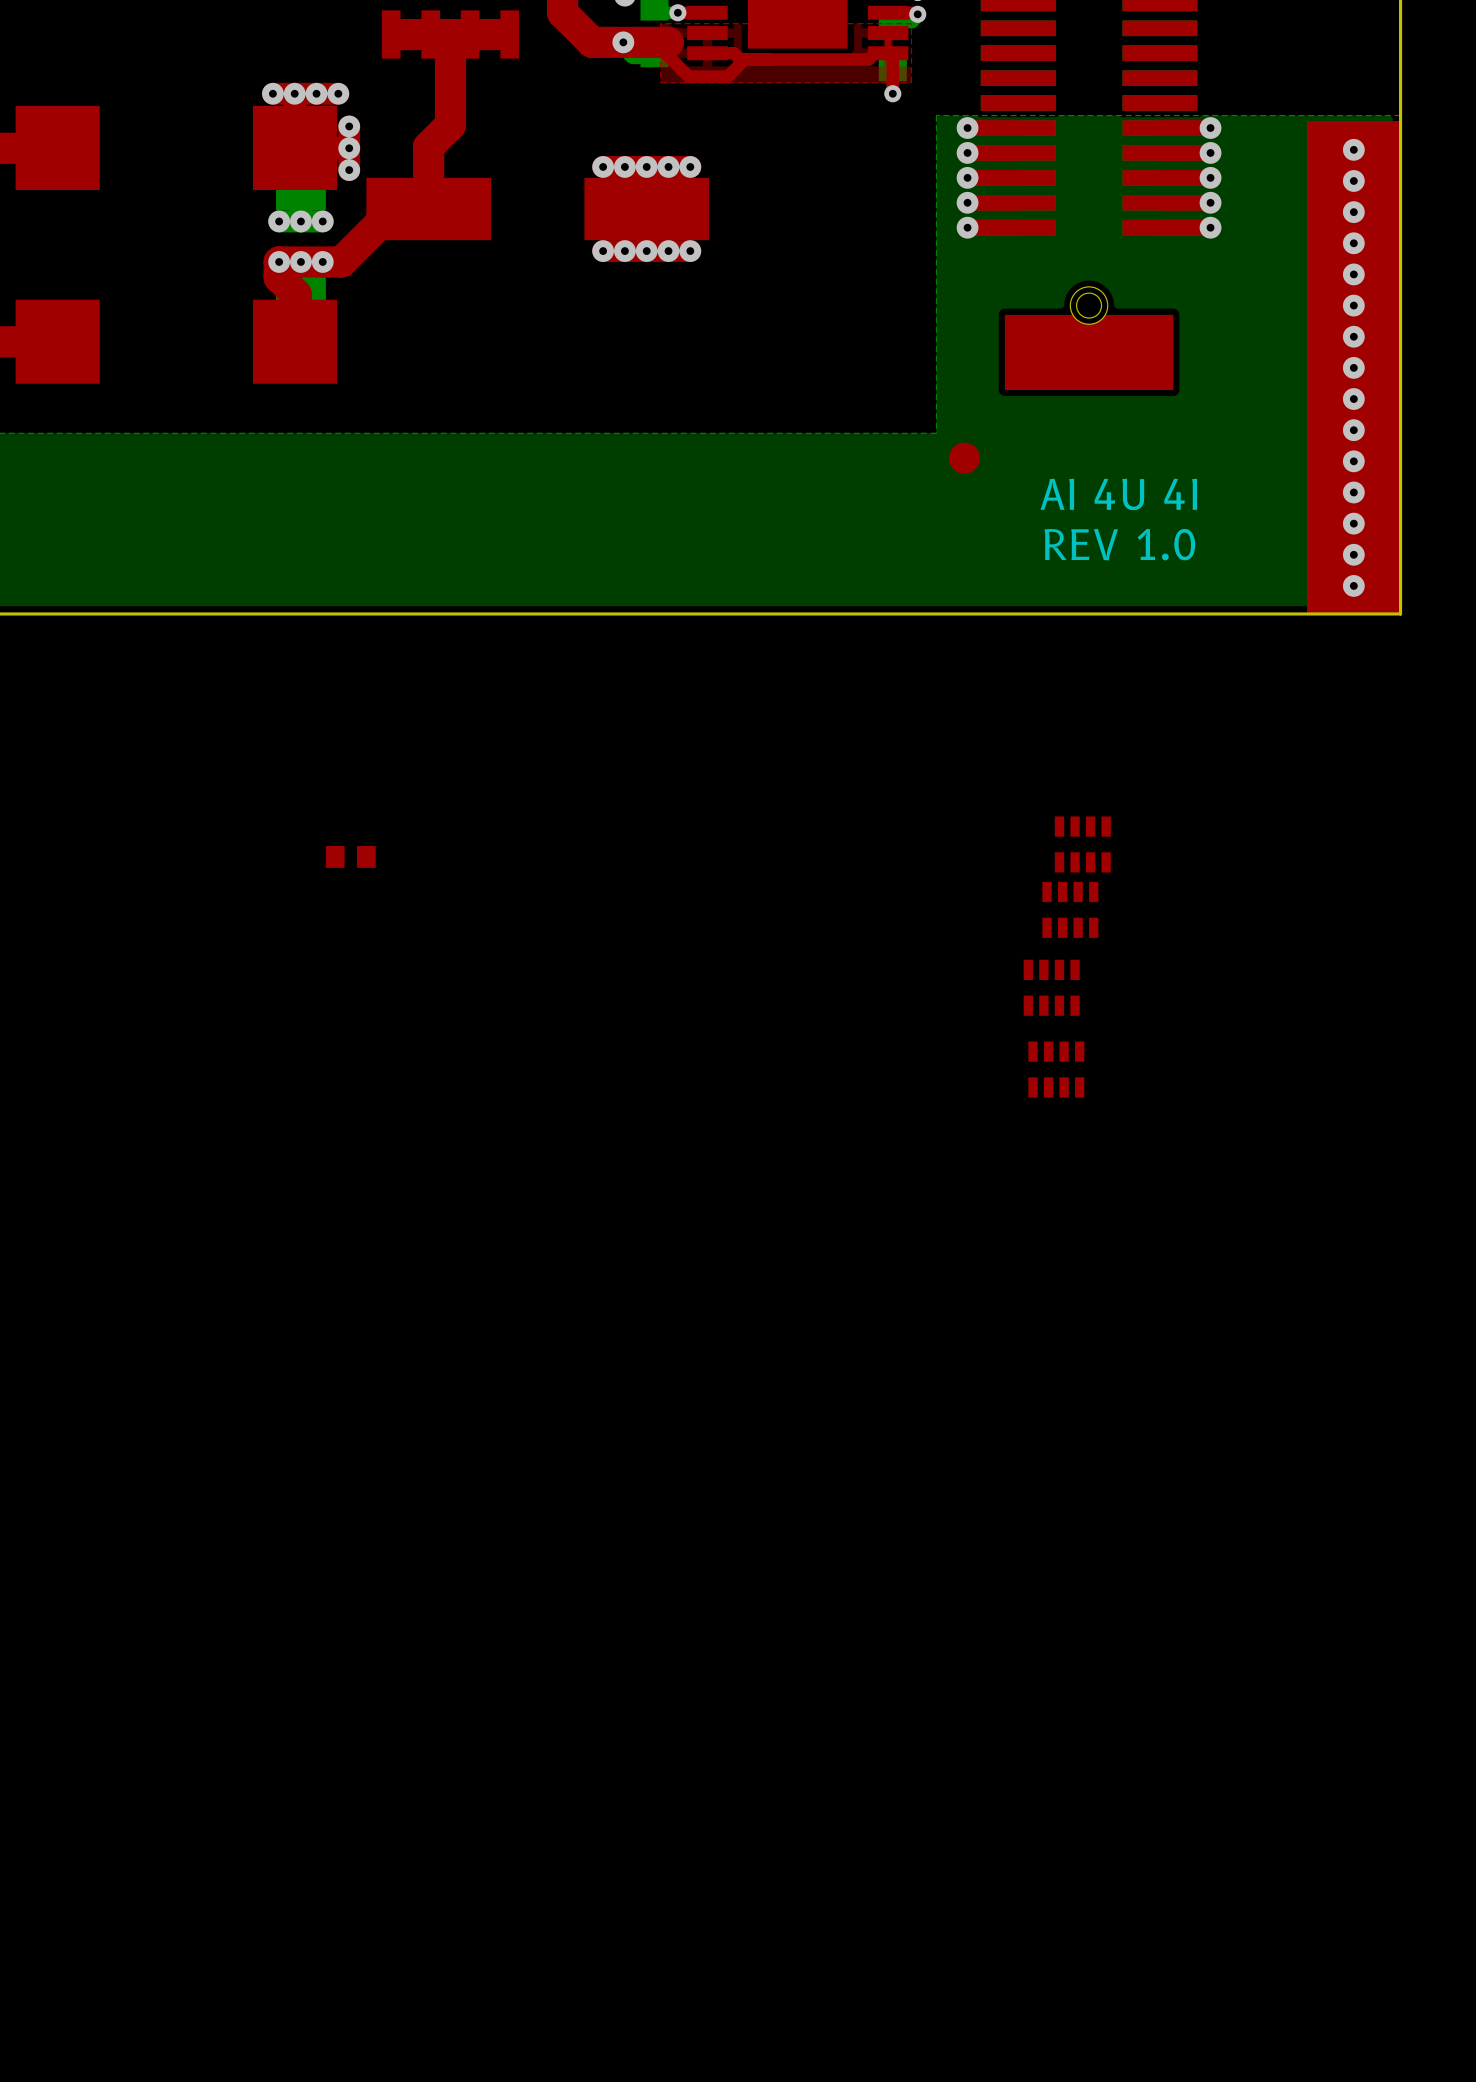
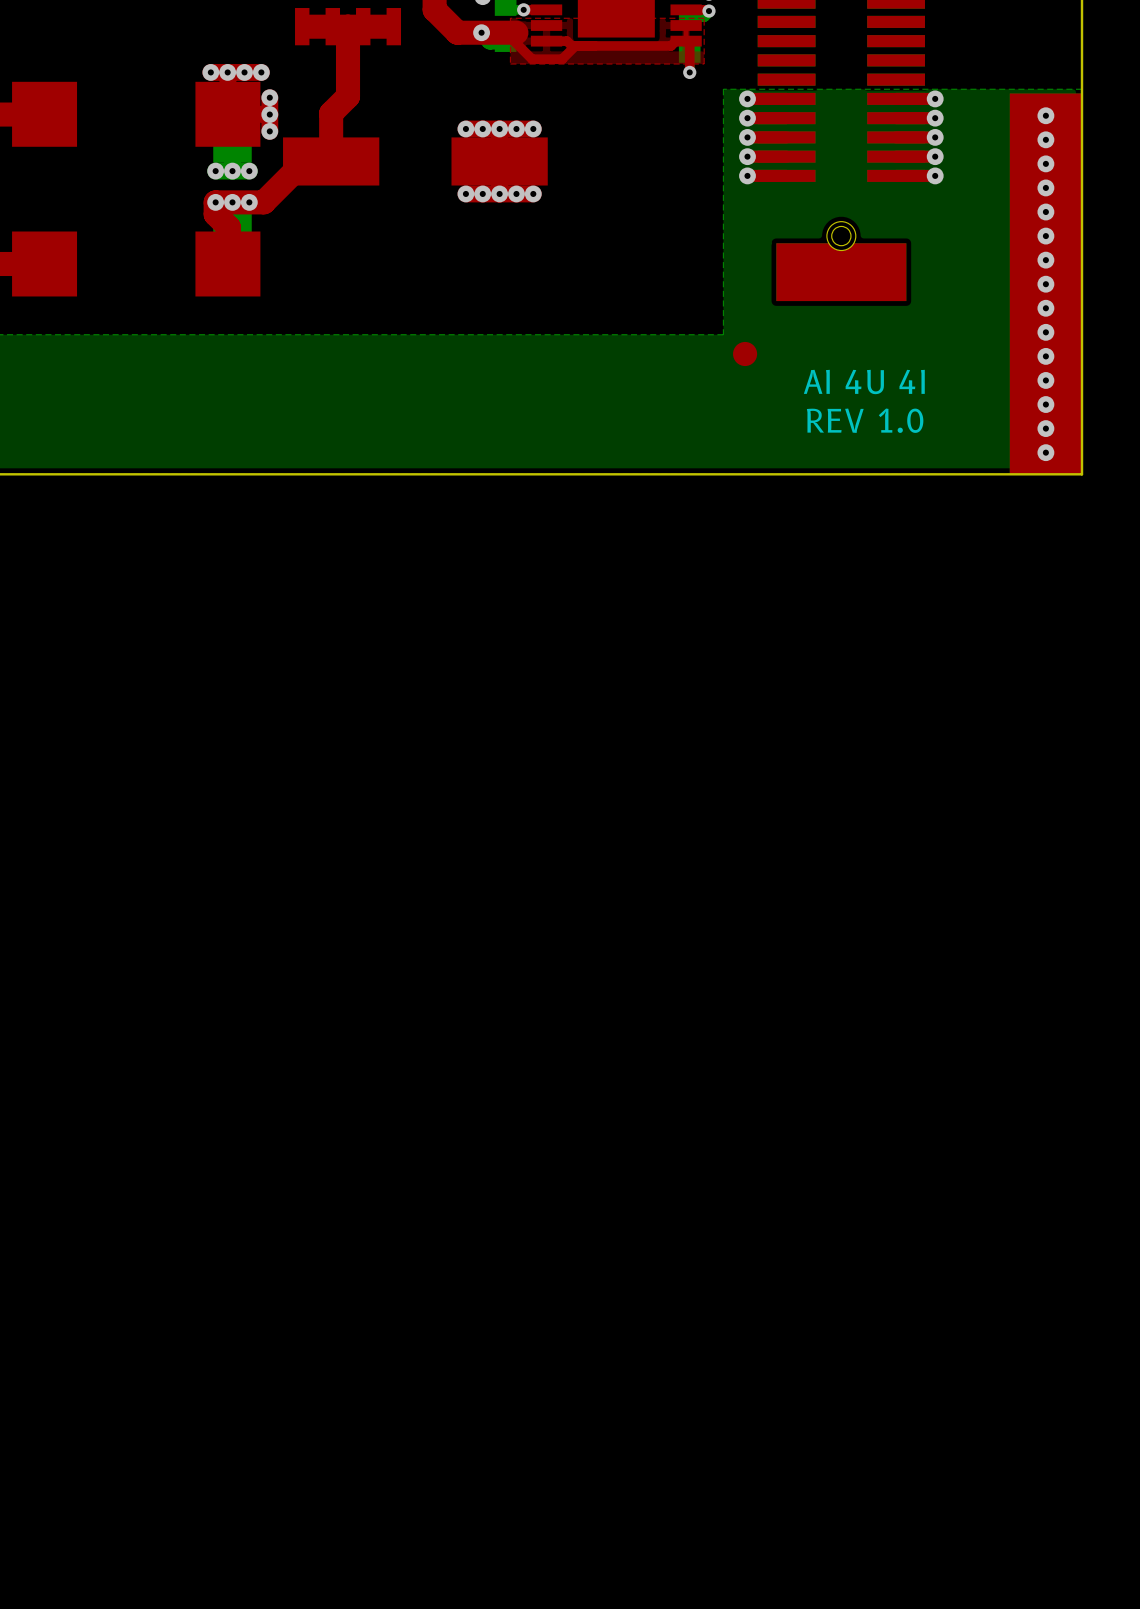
part: (1082, 844) -> none
part: (350, 856) -> none
part: (1070, 909) -> none
part: (1051, 987) -> none
part: (1056, 1069) -> none

